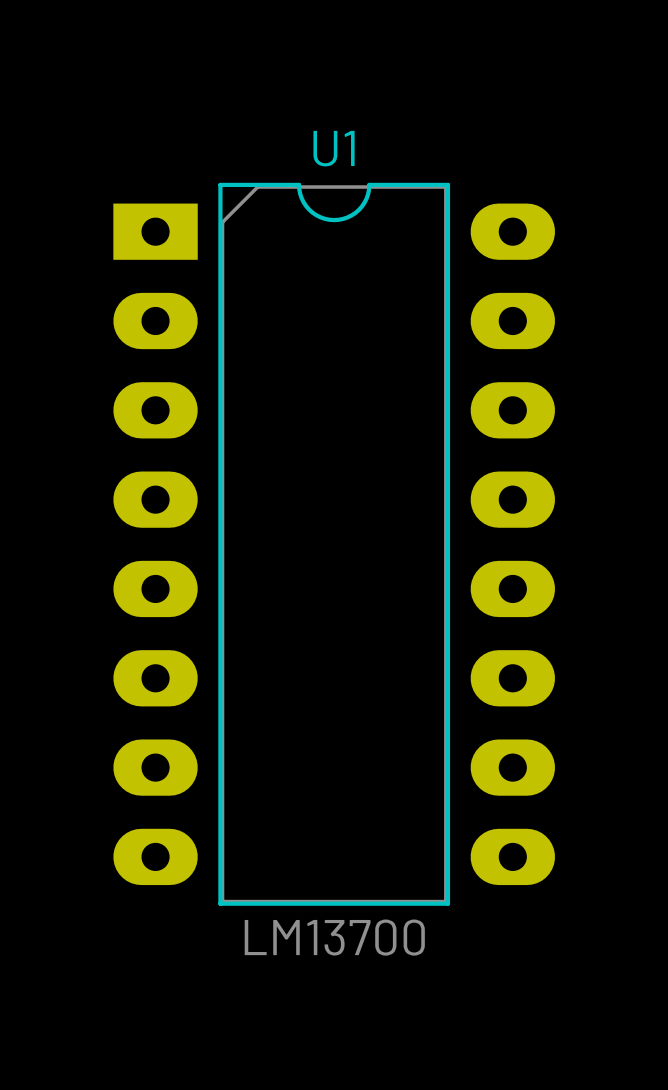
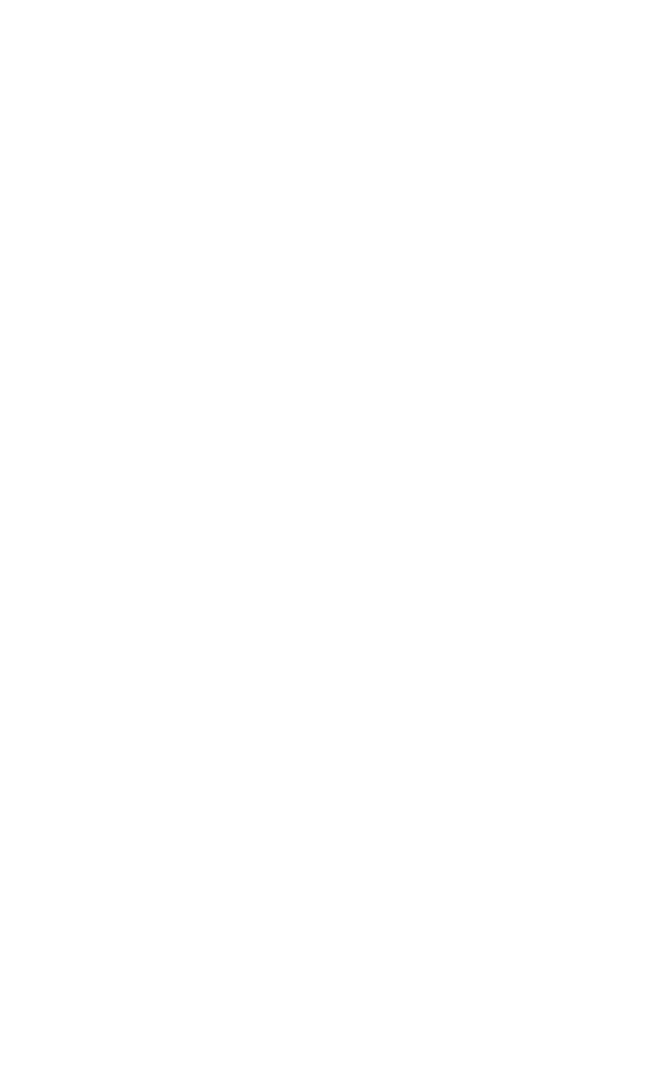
U1: LM13700 (334, 544) -> none

